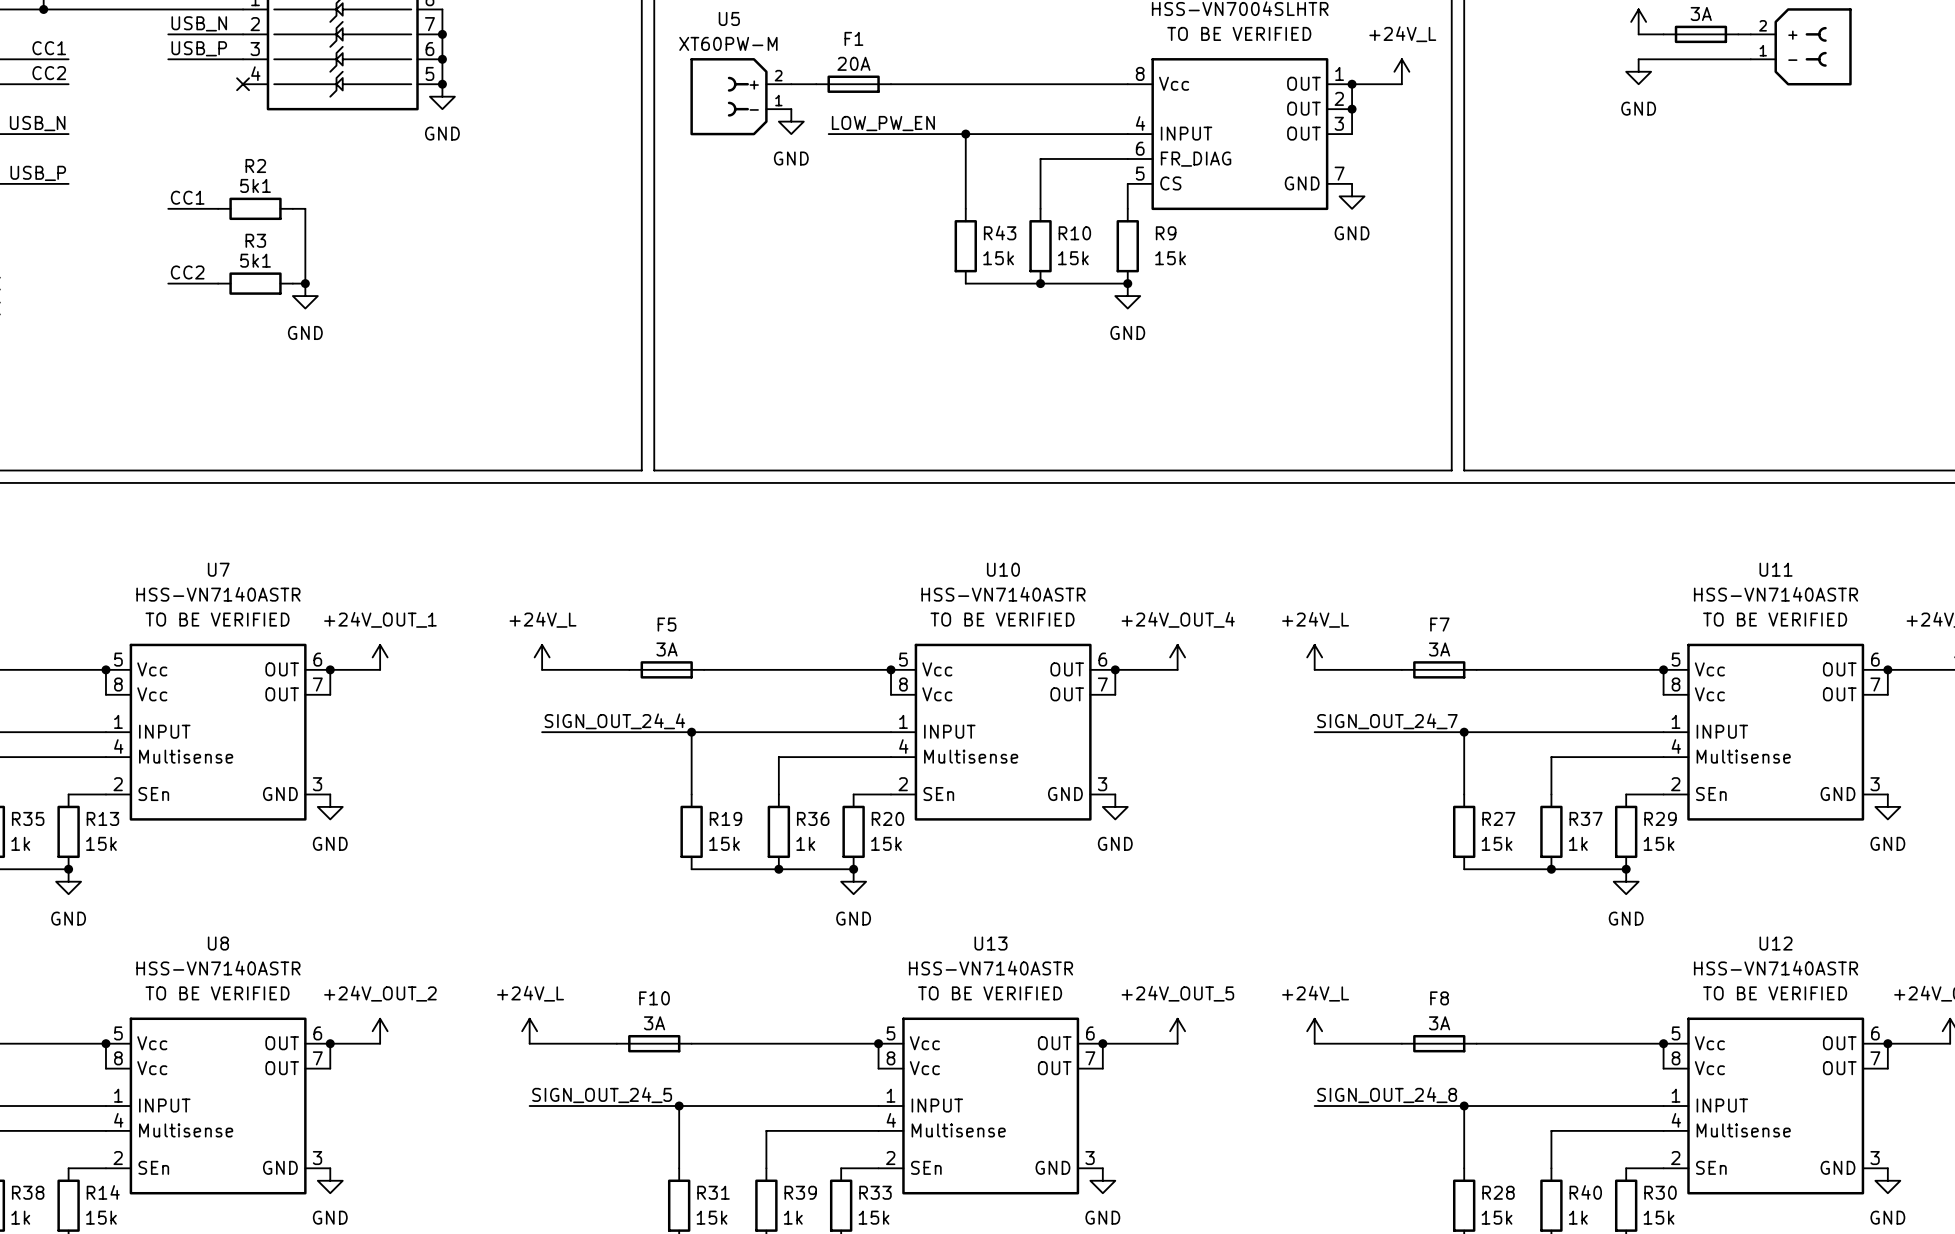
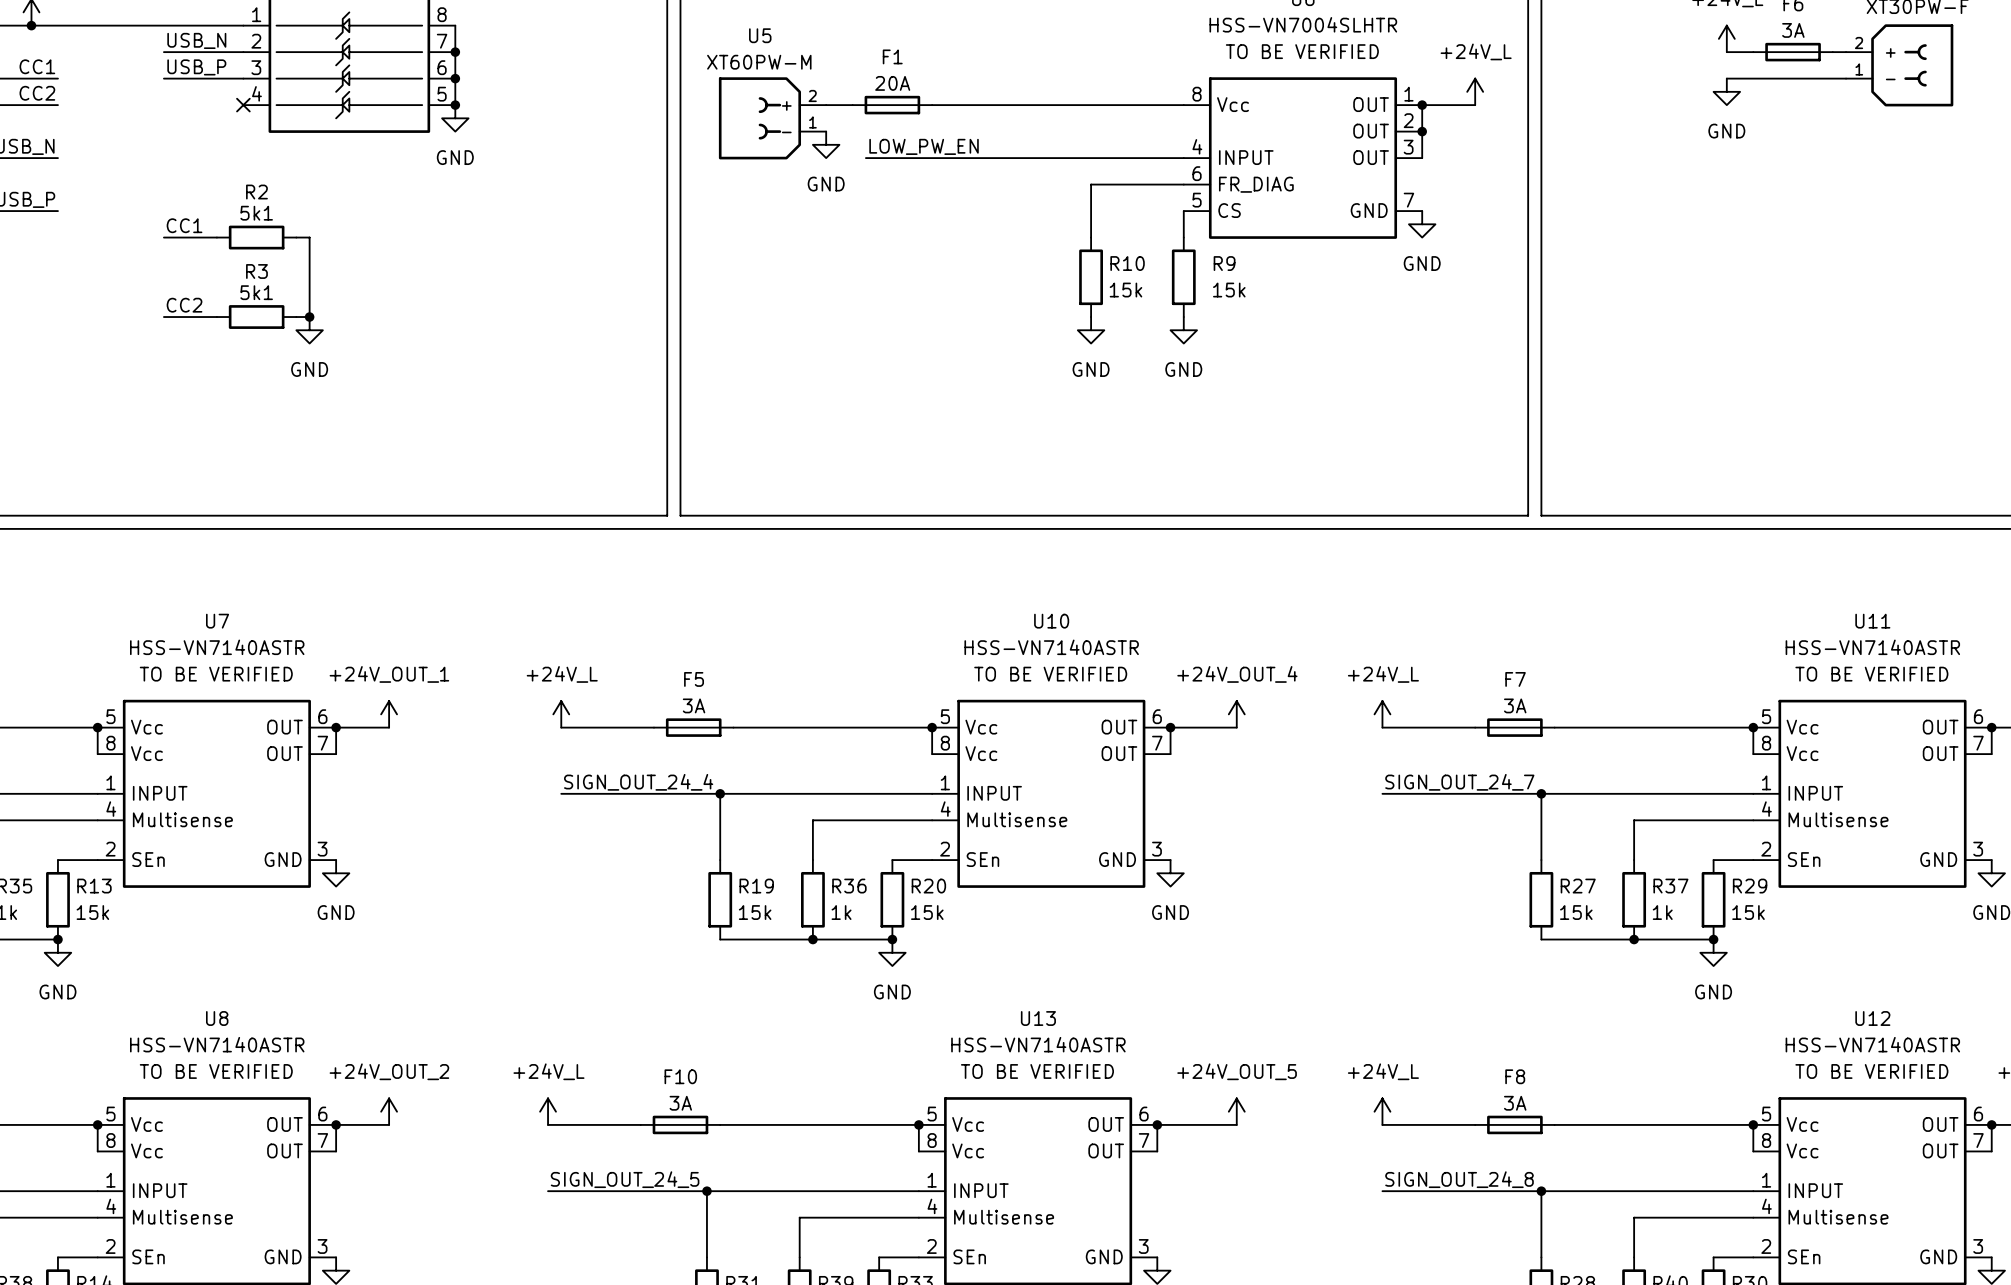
wire: (965, 134) (965, 208) -> none
junction: (965, 134) -> none
R43: 15k (965, 246) -> none
wire: (965, 283) (1127, 283) -> none
junction: (1040, 283) -> none
junction: (1127, 283) -> none
power symbol: none -> GND (1091, 330)

